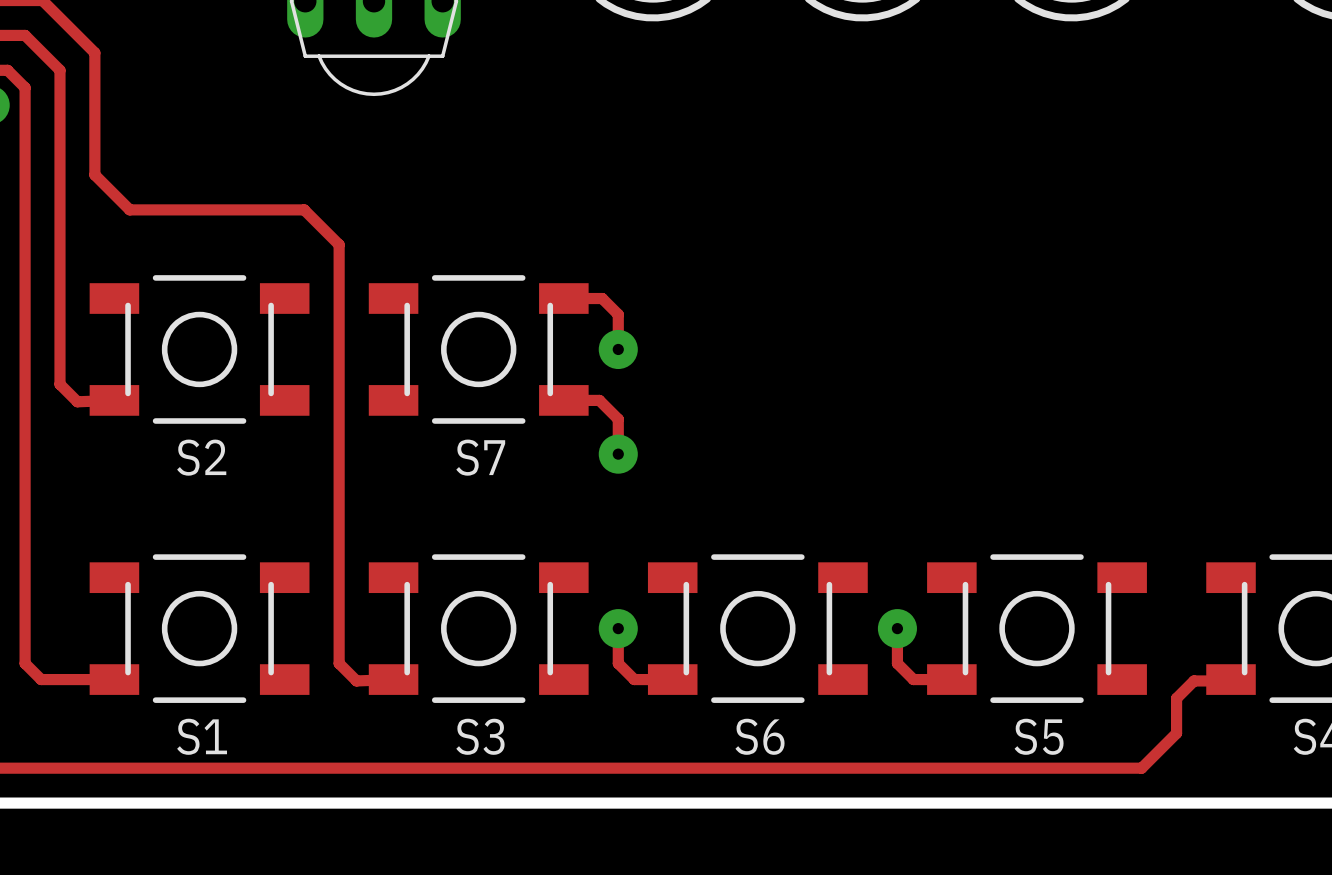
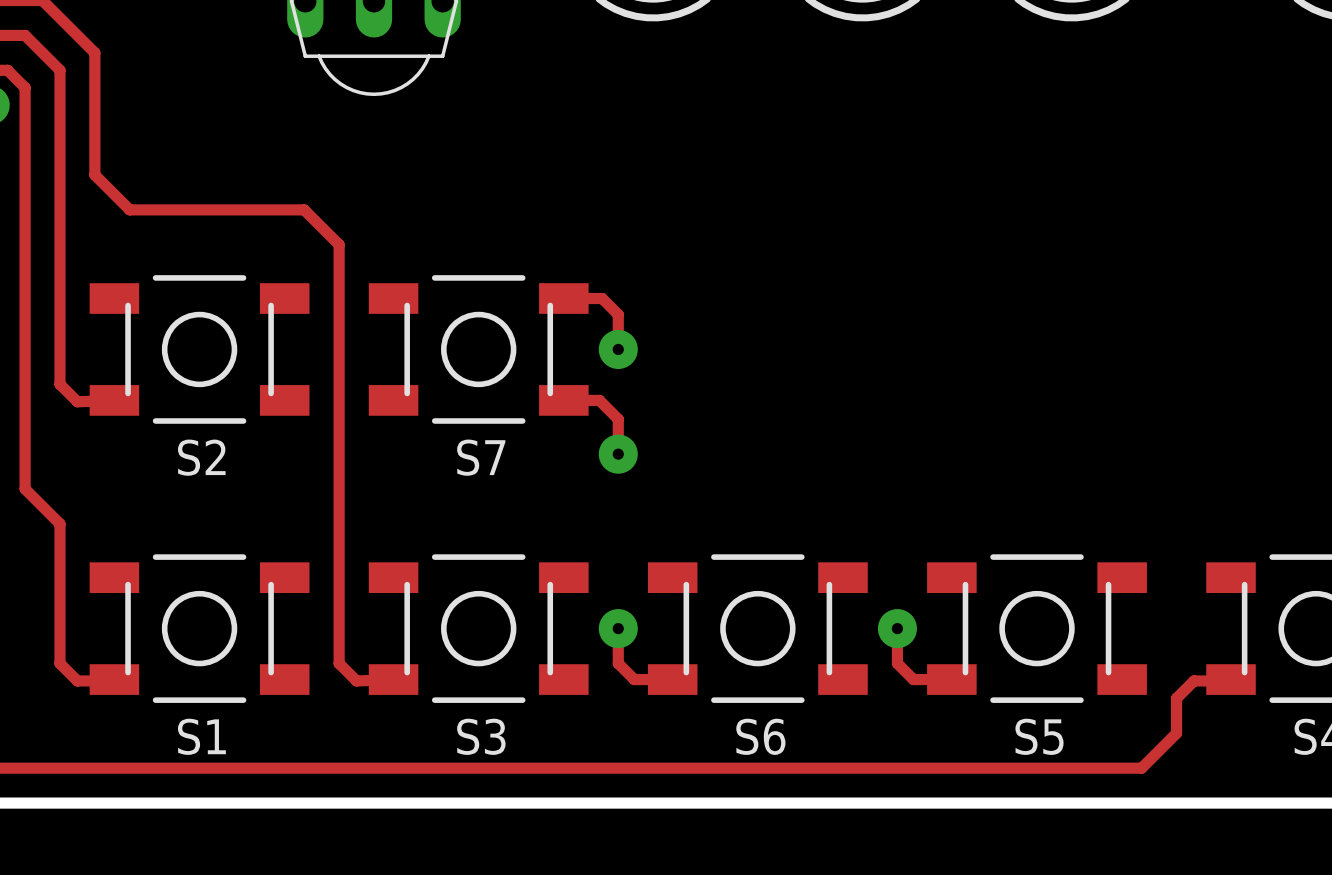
track: (25, 489) (25, 663) (41, 679) (114, 679) -> (25, 489) (59, 523) (59, 663) (77, 680) (114, 679)

